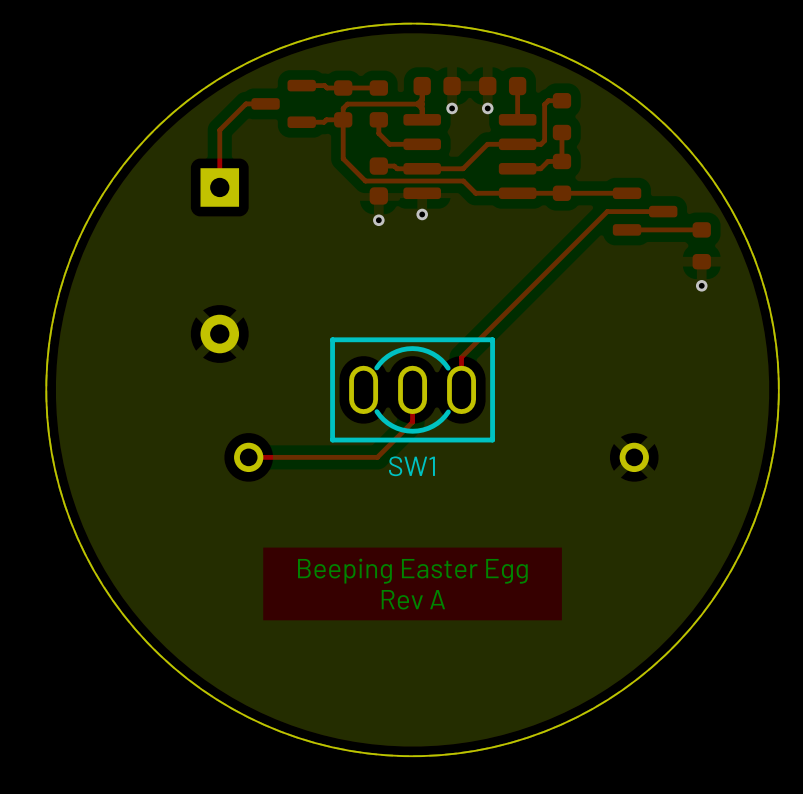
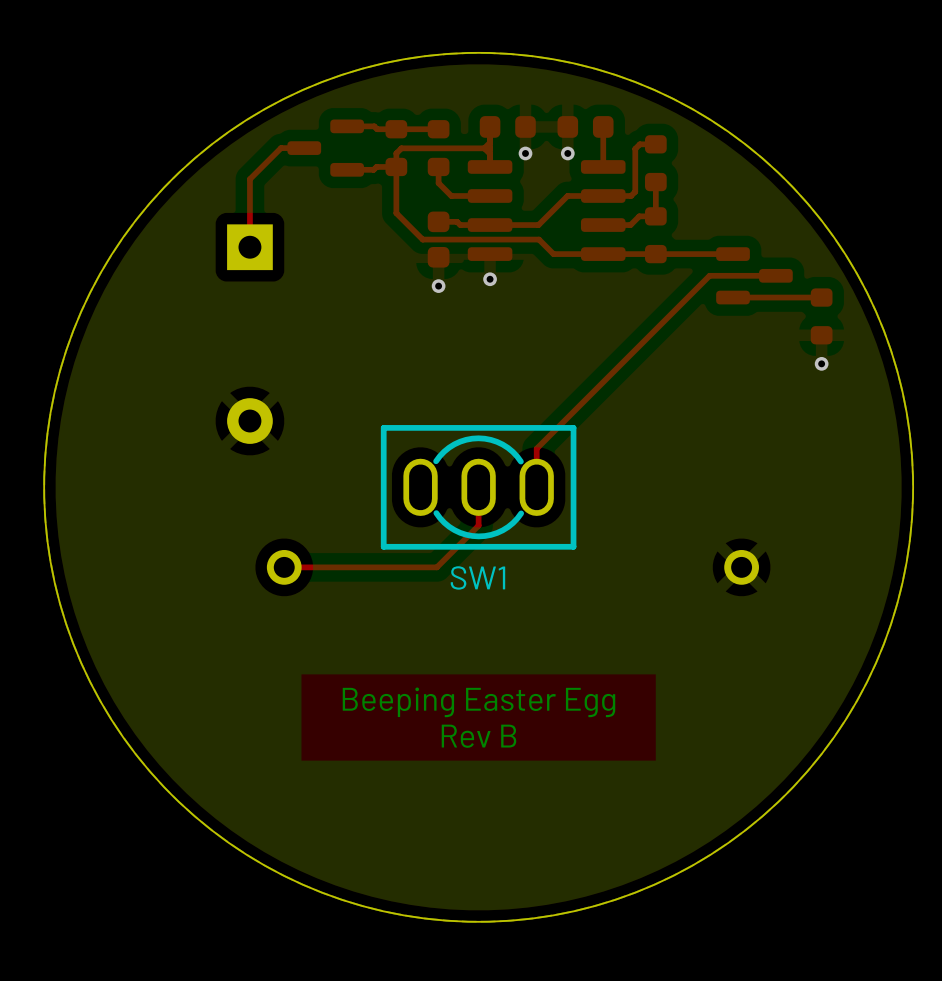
text: Rev A (413, 599) -> Rev B (478, 736)

